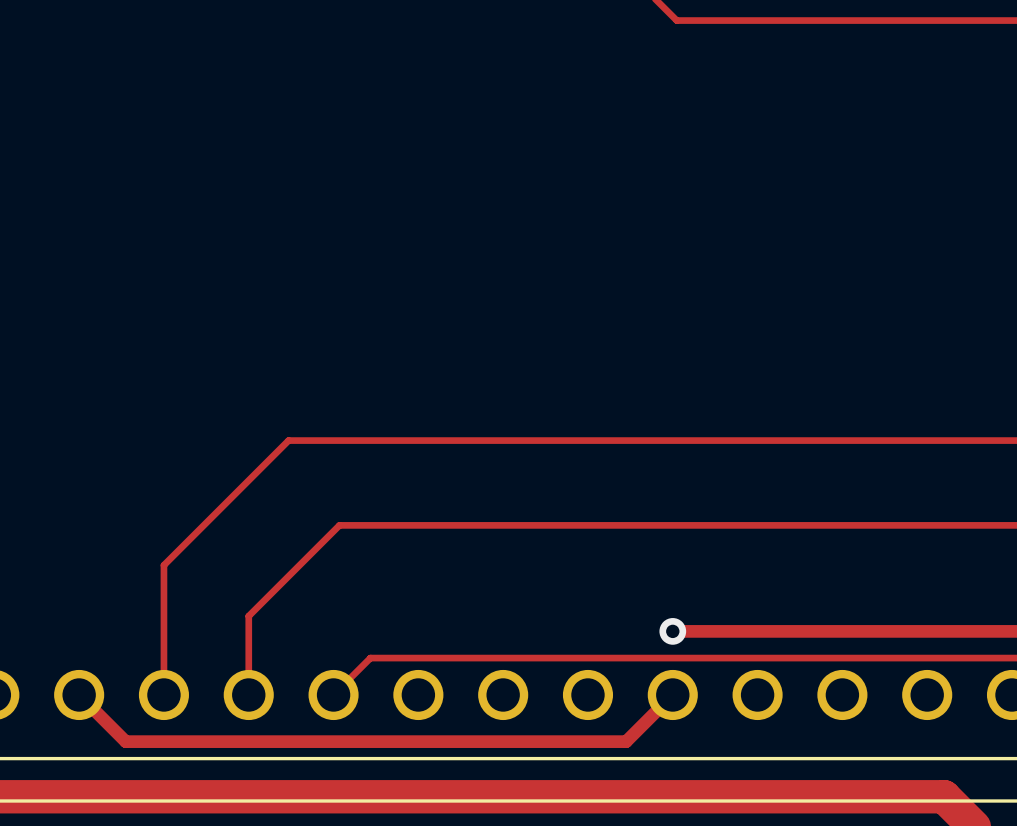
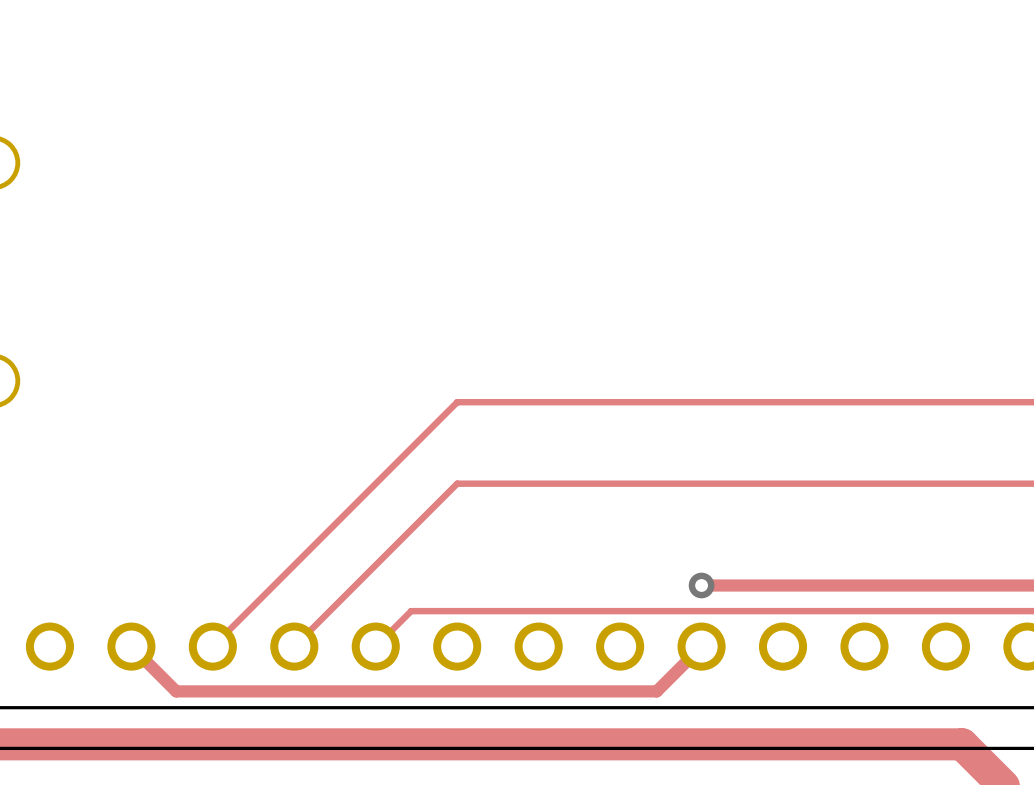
track: (418, 440) (288, 440) (163, 565) (163, 694) -> (457, 402) (212, 646)
track: (418, 525) (339, 525) (248, 616) (248, 694) -> (457, 483) (294, 646)

